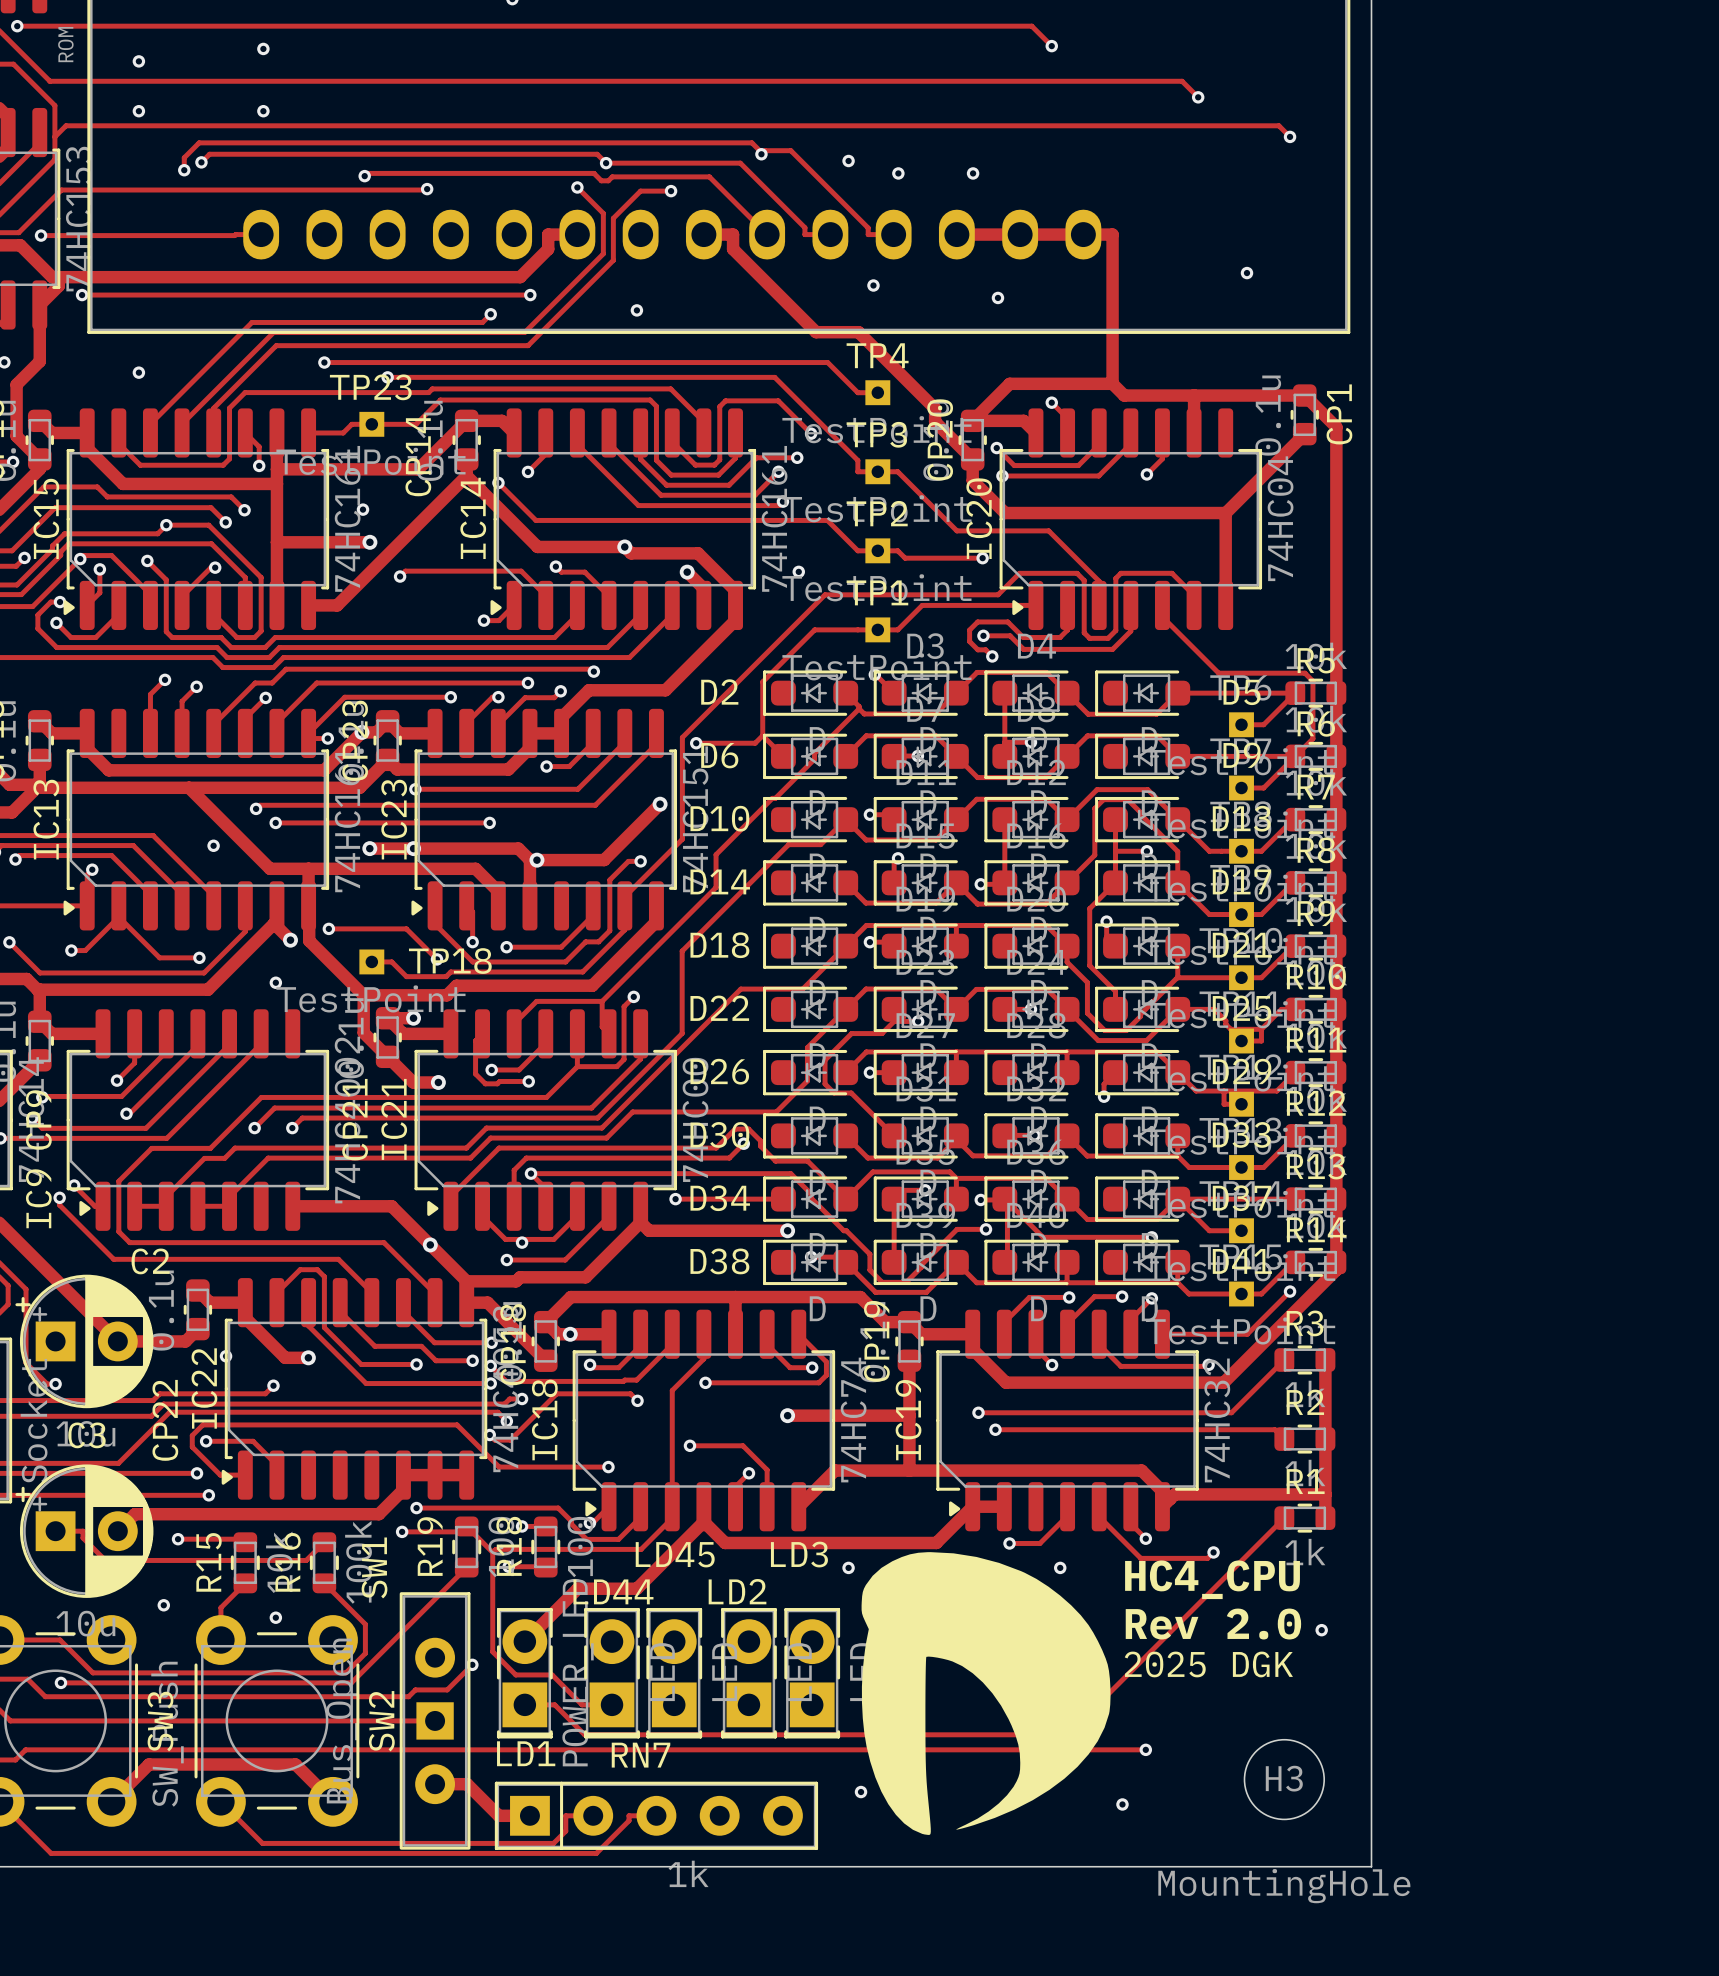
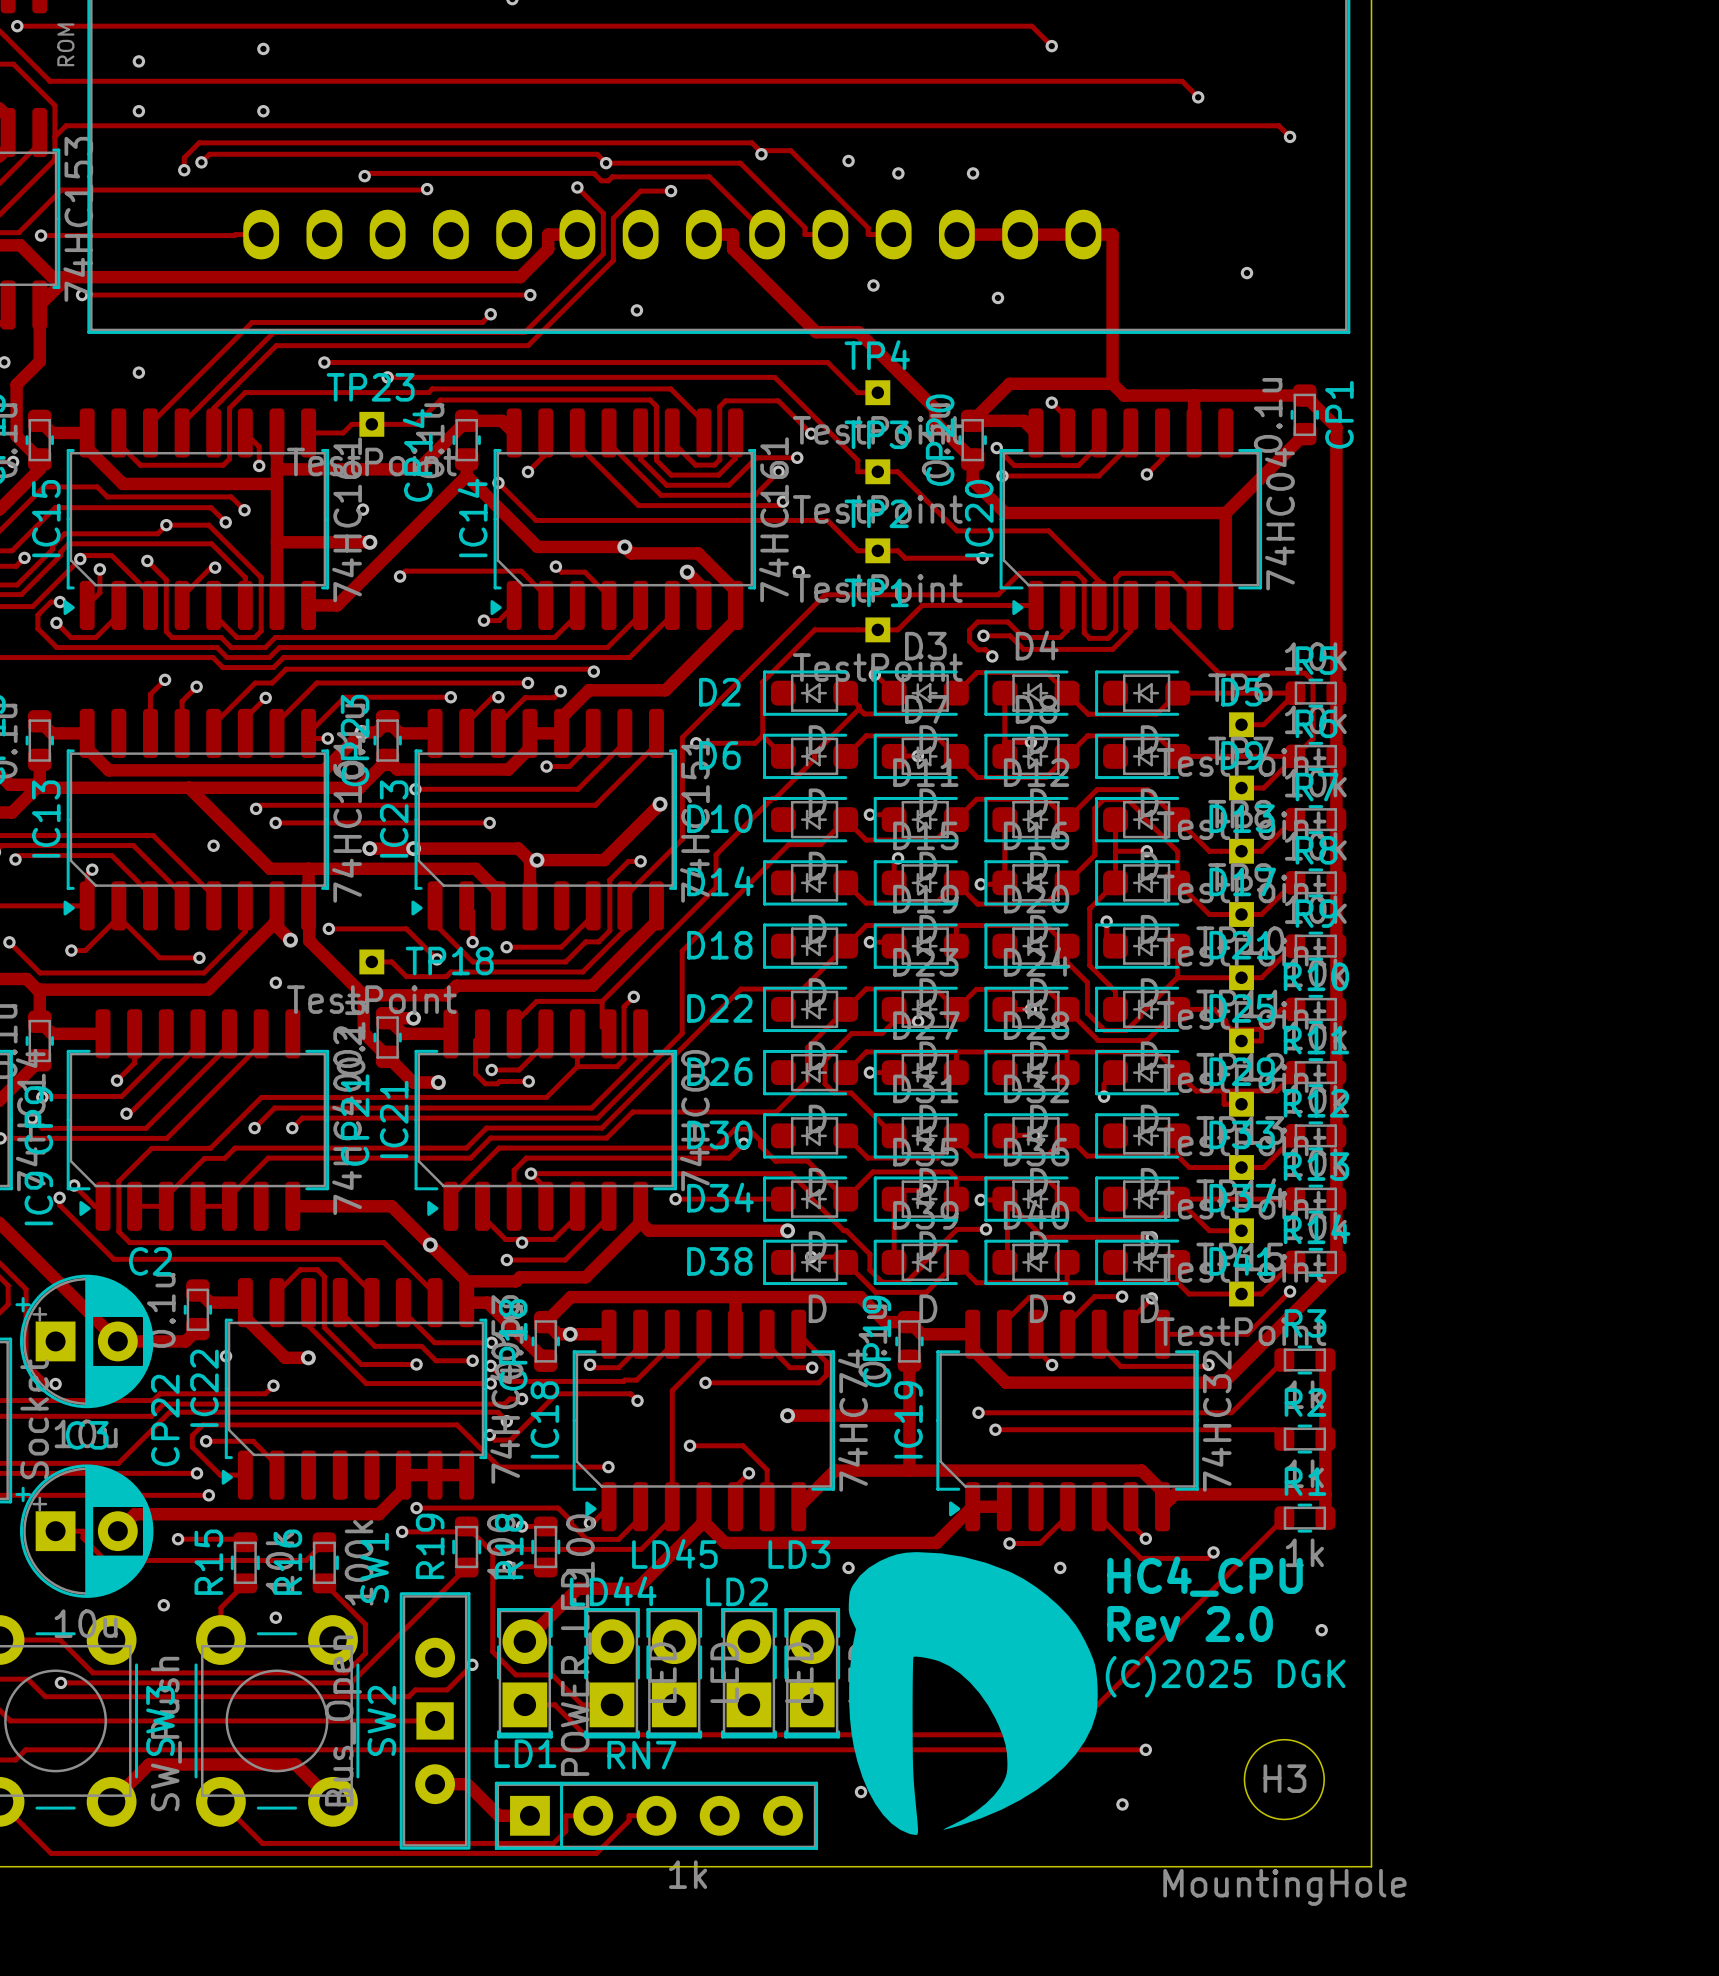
text position: HC4_CPU (1212, 1579) -> HC4_CPU (1205, 1576)
text position: Rev 2.0 (1213, 1624) -> Rev 2.0 (1190, 1624)
text: 2025 DGK (1208, 1664) -> (C)2025 DGK (1225, 1676)
drawing position: (986, 1693) -> (973, 1693)

